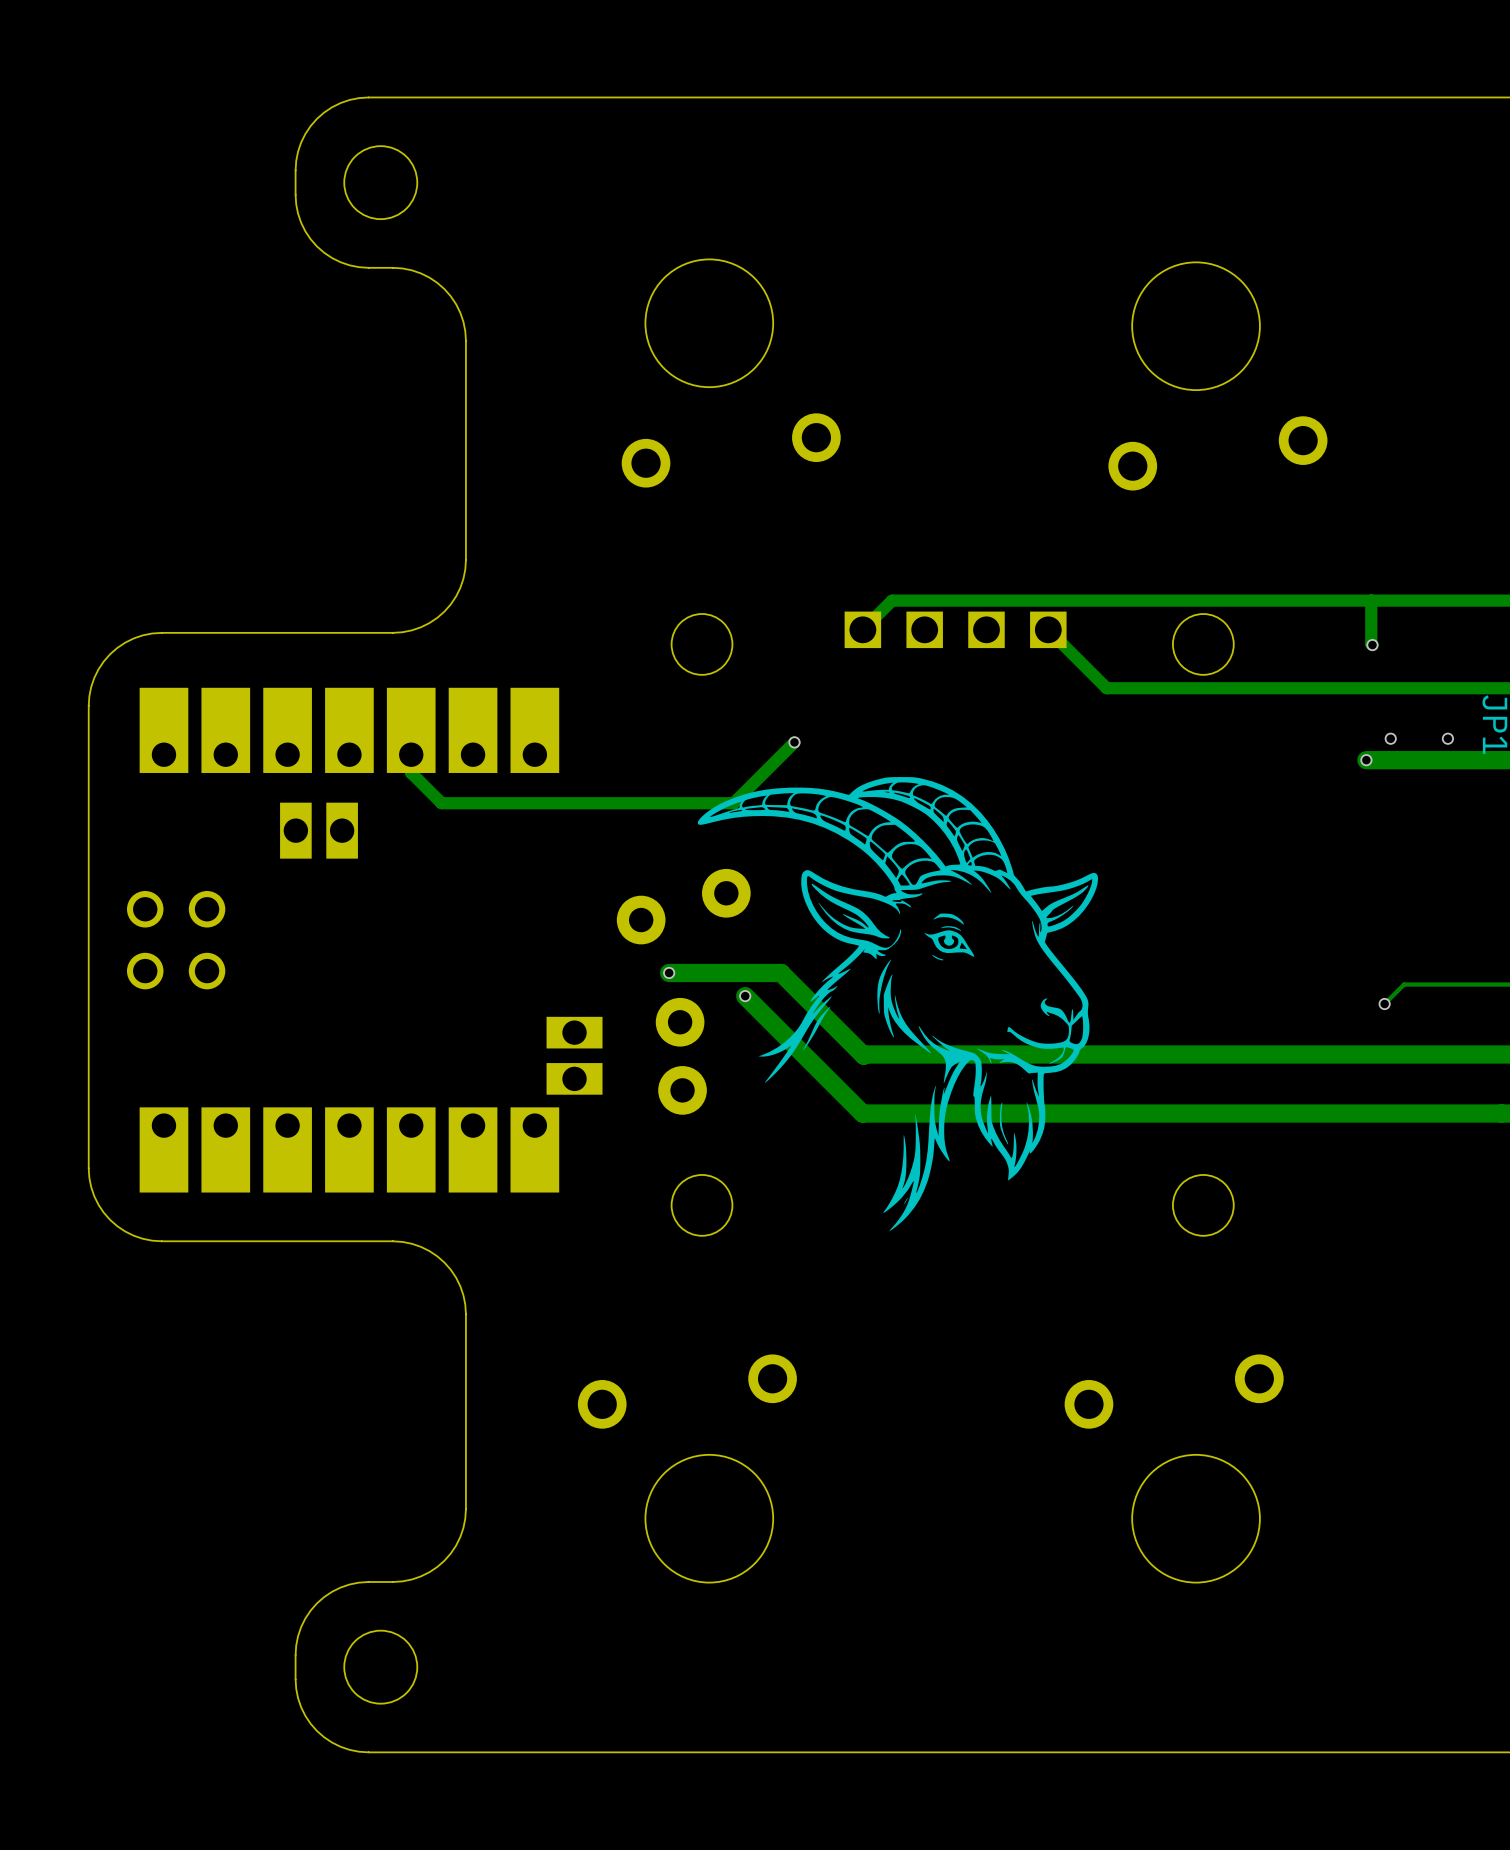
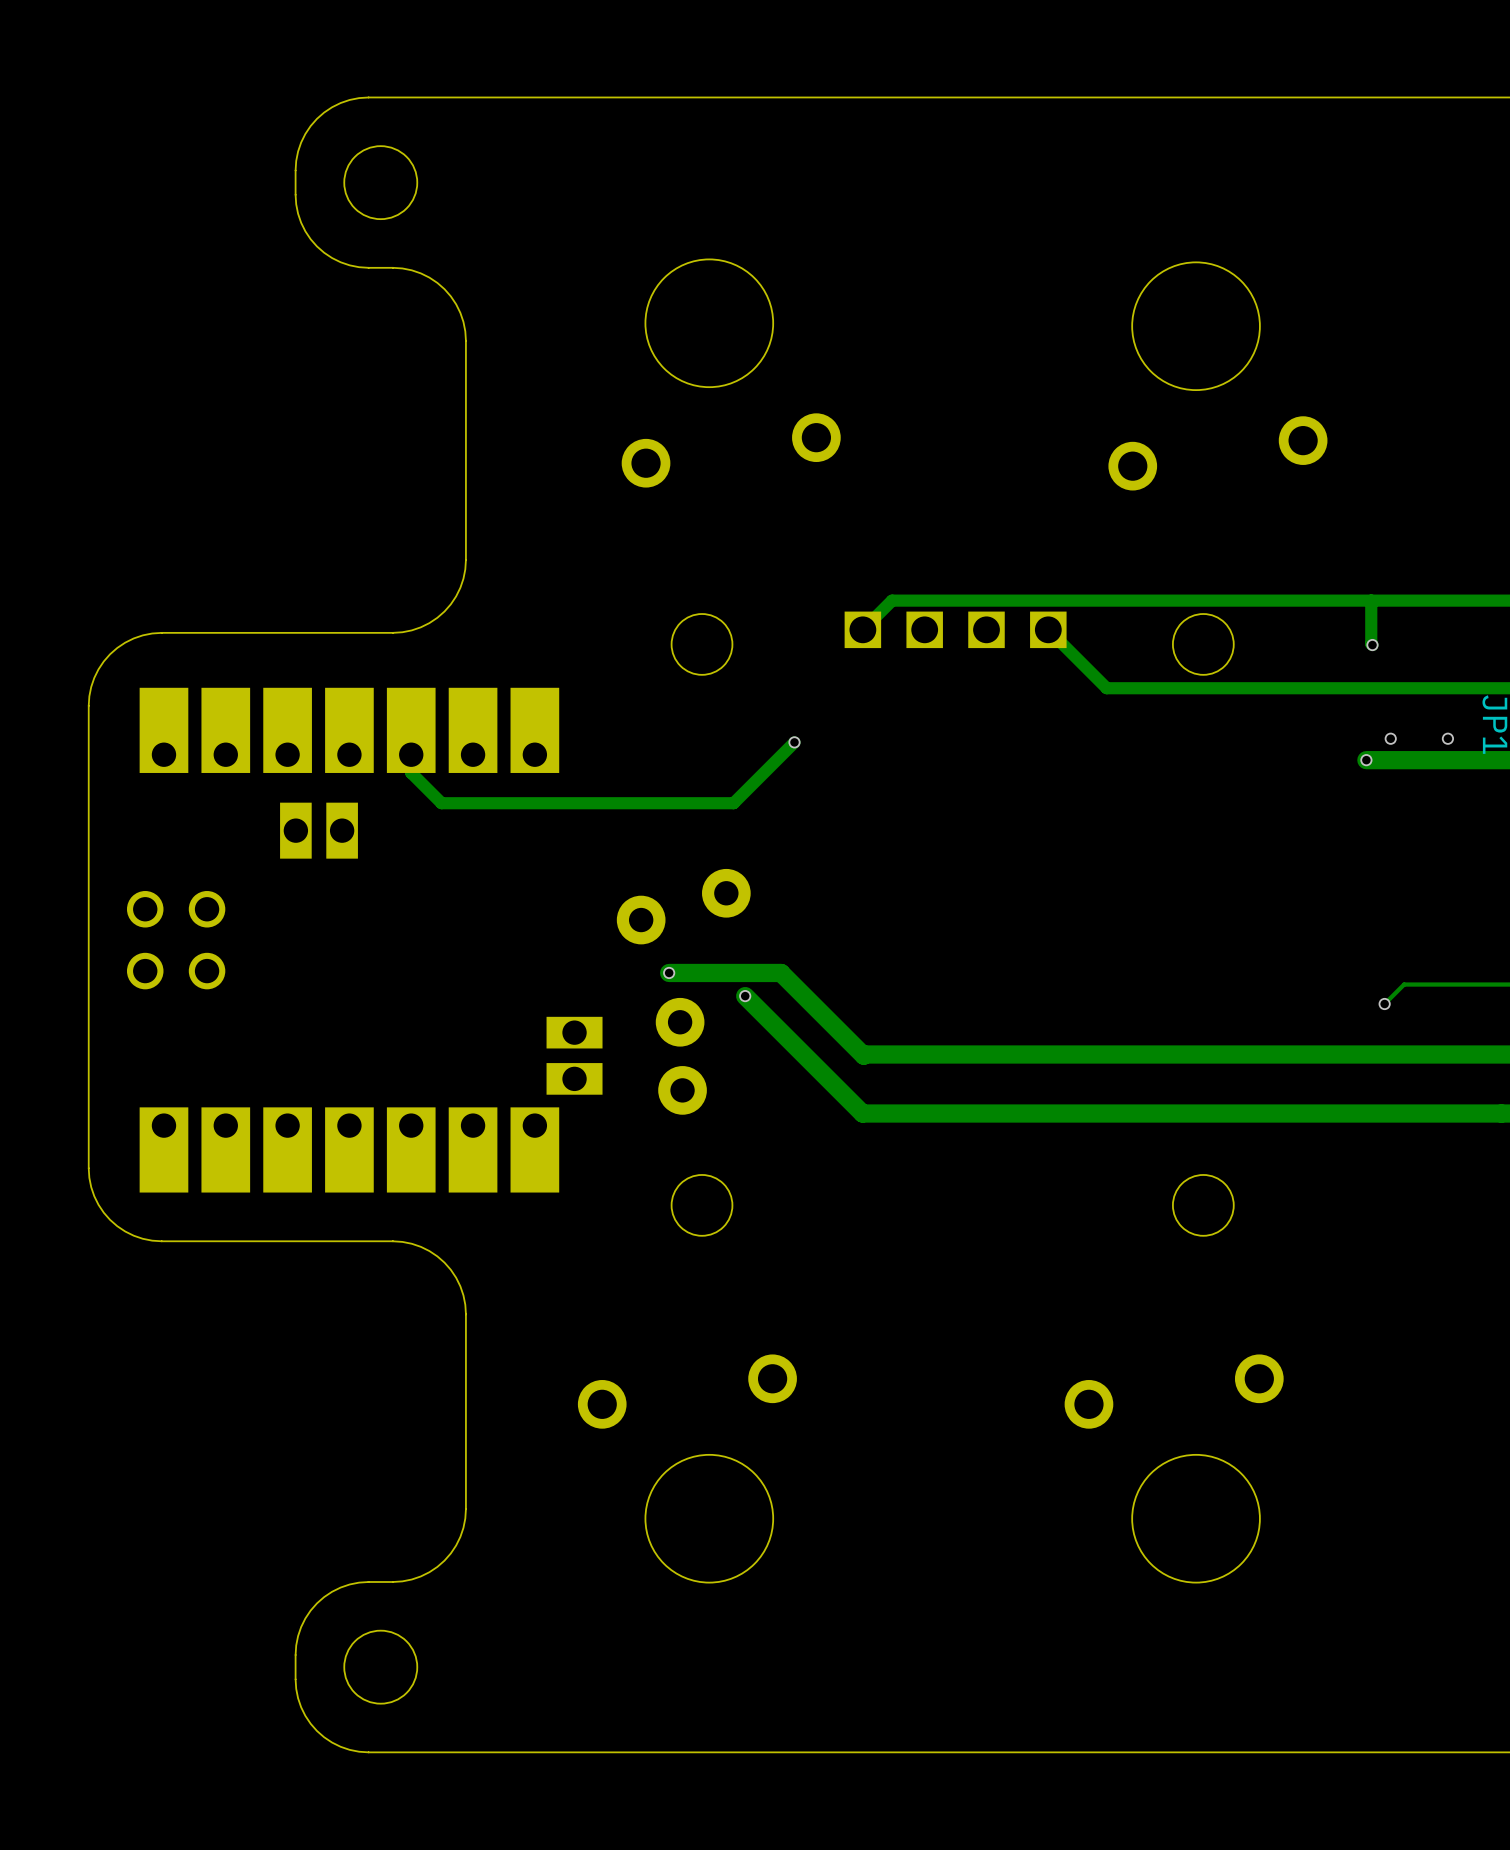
drawing: [697, 777, 1099, 1231] -> none

